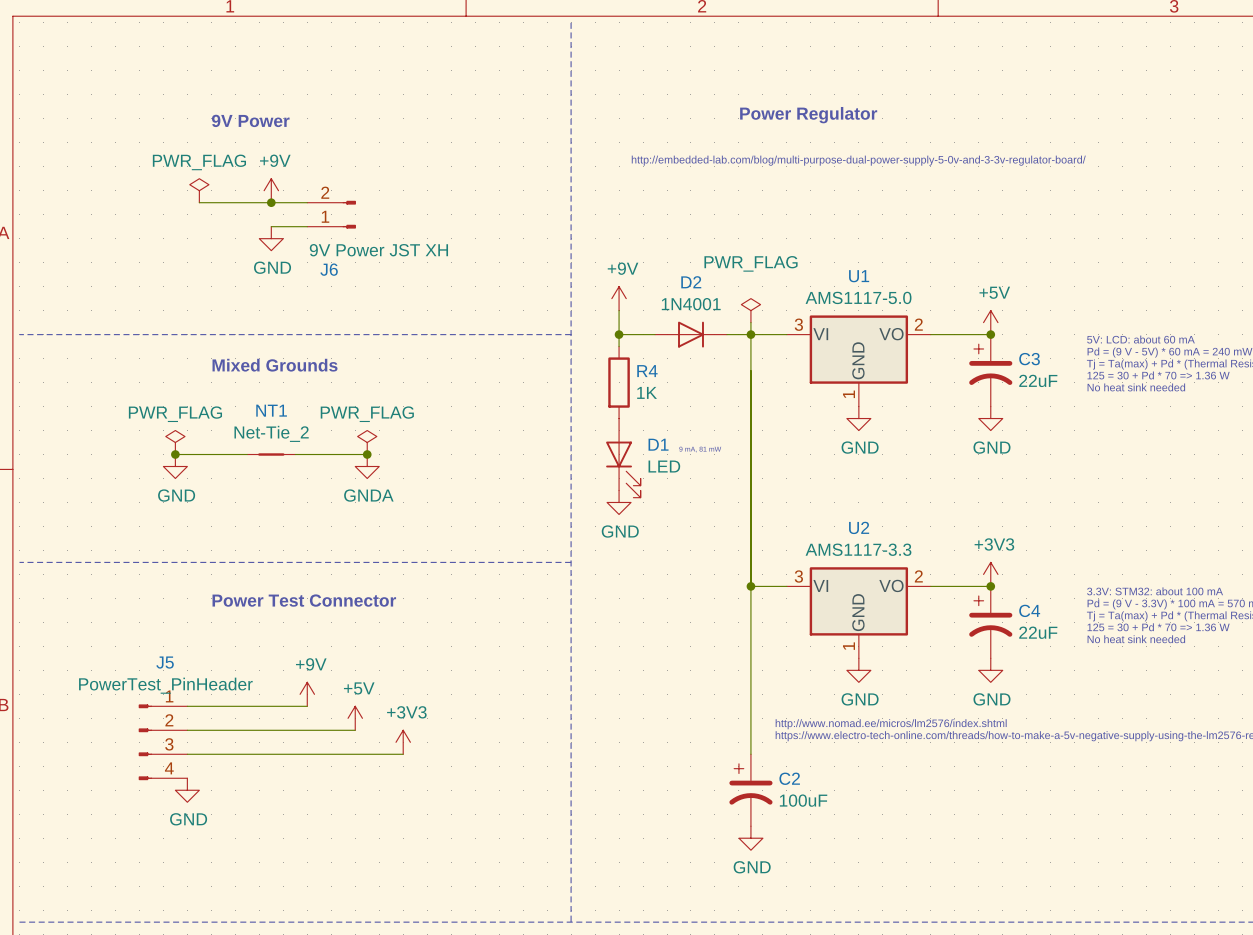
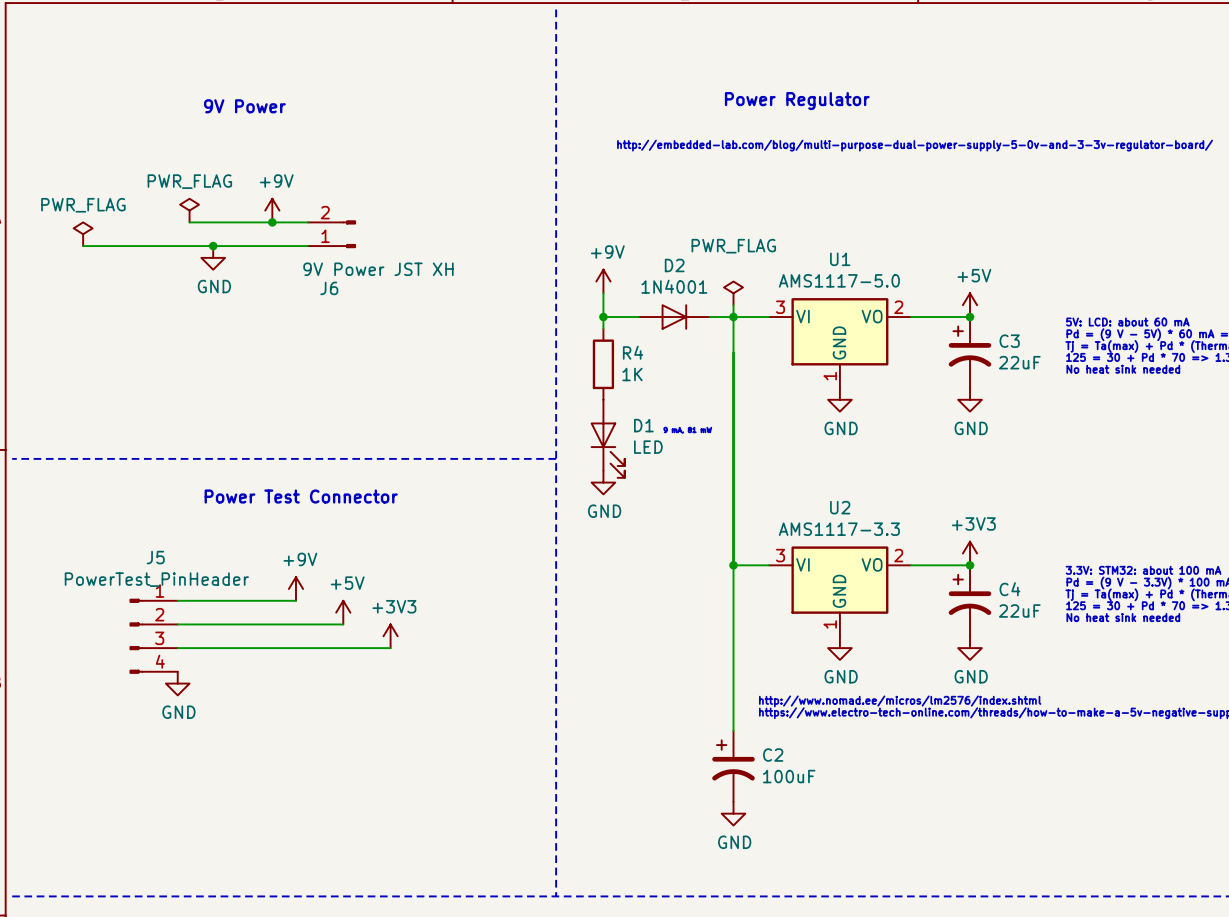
power symbol position: PWR_FLAG (199, 190) -> PWR_FLAG (189, 210)
power symbol position: +9V (271, 190) -> +9V (272, 210)
wire: (199, 202) (307, 202) -> none
junction position: (271, 202) -> (272, 222)
J6 position: (331, 214) -> (331, 234)
wire: (271, 226) (307, 226) -> none
wire: none -> (189, 222) (307, 222)
power symbol position: GND (271, 238) -> GND (213, 257)
power symbol: none -> PWR_FLAG (83, 234)
wire: none -> (83, 246) (307, 246)
junction: none -> (213, 246)
line: (19, 334) (571, 334) -> none
text: Mixed Grounds (275, 365) -> none
power symbol: PWR_FLAG (175, 442) -> none
power symbol: PWR_FLAG (367, 442) -> none
wire: (175, 454) (247, 454) -> none
junction: (175, 454) -> none
NT1: Net-Tie_2 (271, 454) -> none
wire: (295, 454) (367, 454) -> none
junction: (367, 454) -> none
power symbol: GND (175, 466) -> none
power symbol: GNDA (367, 466) -> none
line: (19, 562) (571, 562) -> (12, 458) (556, 458)
text position: Power Test Connector (304, 600) -> Power Test Connector (301, 496)
power symbol position: +9V (307, 694) -> +9V (295, 588)
wire: (187, 706) (307, 706) -> (177, 600) (295, 600)
power symbol position: +5V (355, 718) -> +5V (343, 612)
wire: (187, 730) (355, 730) -> (177, 624) (343, 624)
J5 position: (163, 742) -> (153, 636)
power symbol position: +3V3 (403, 742) -> +3V3 (390, 636)
wire: (187, 754) (403, 754) -> (177, 648) (390, 648)
power symbol position: GND (187, 790) -> GND (177, 683)

